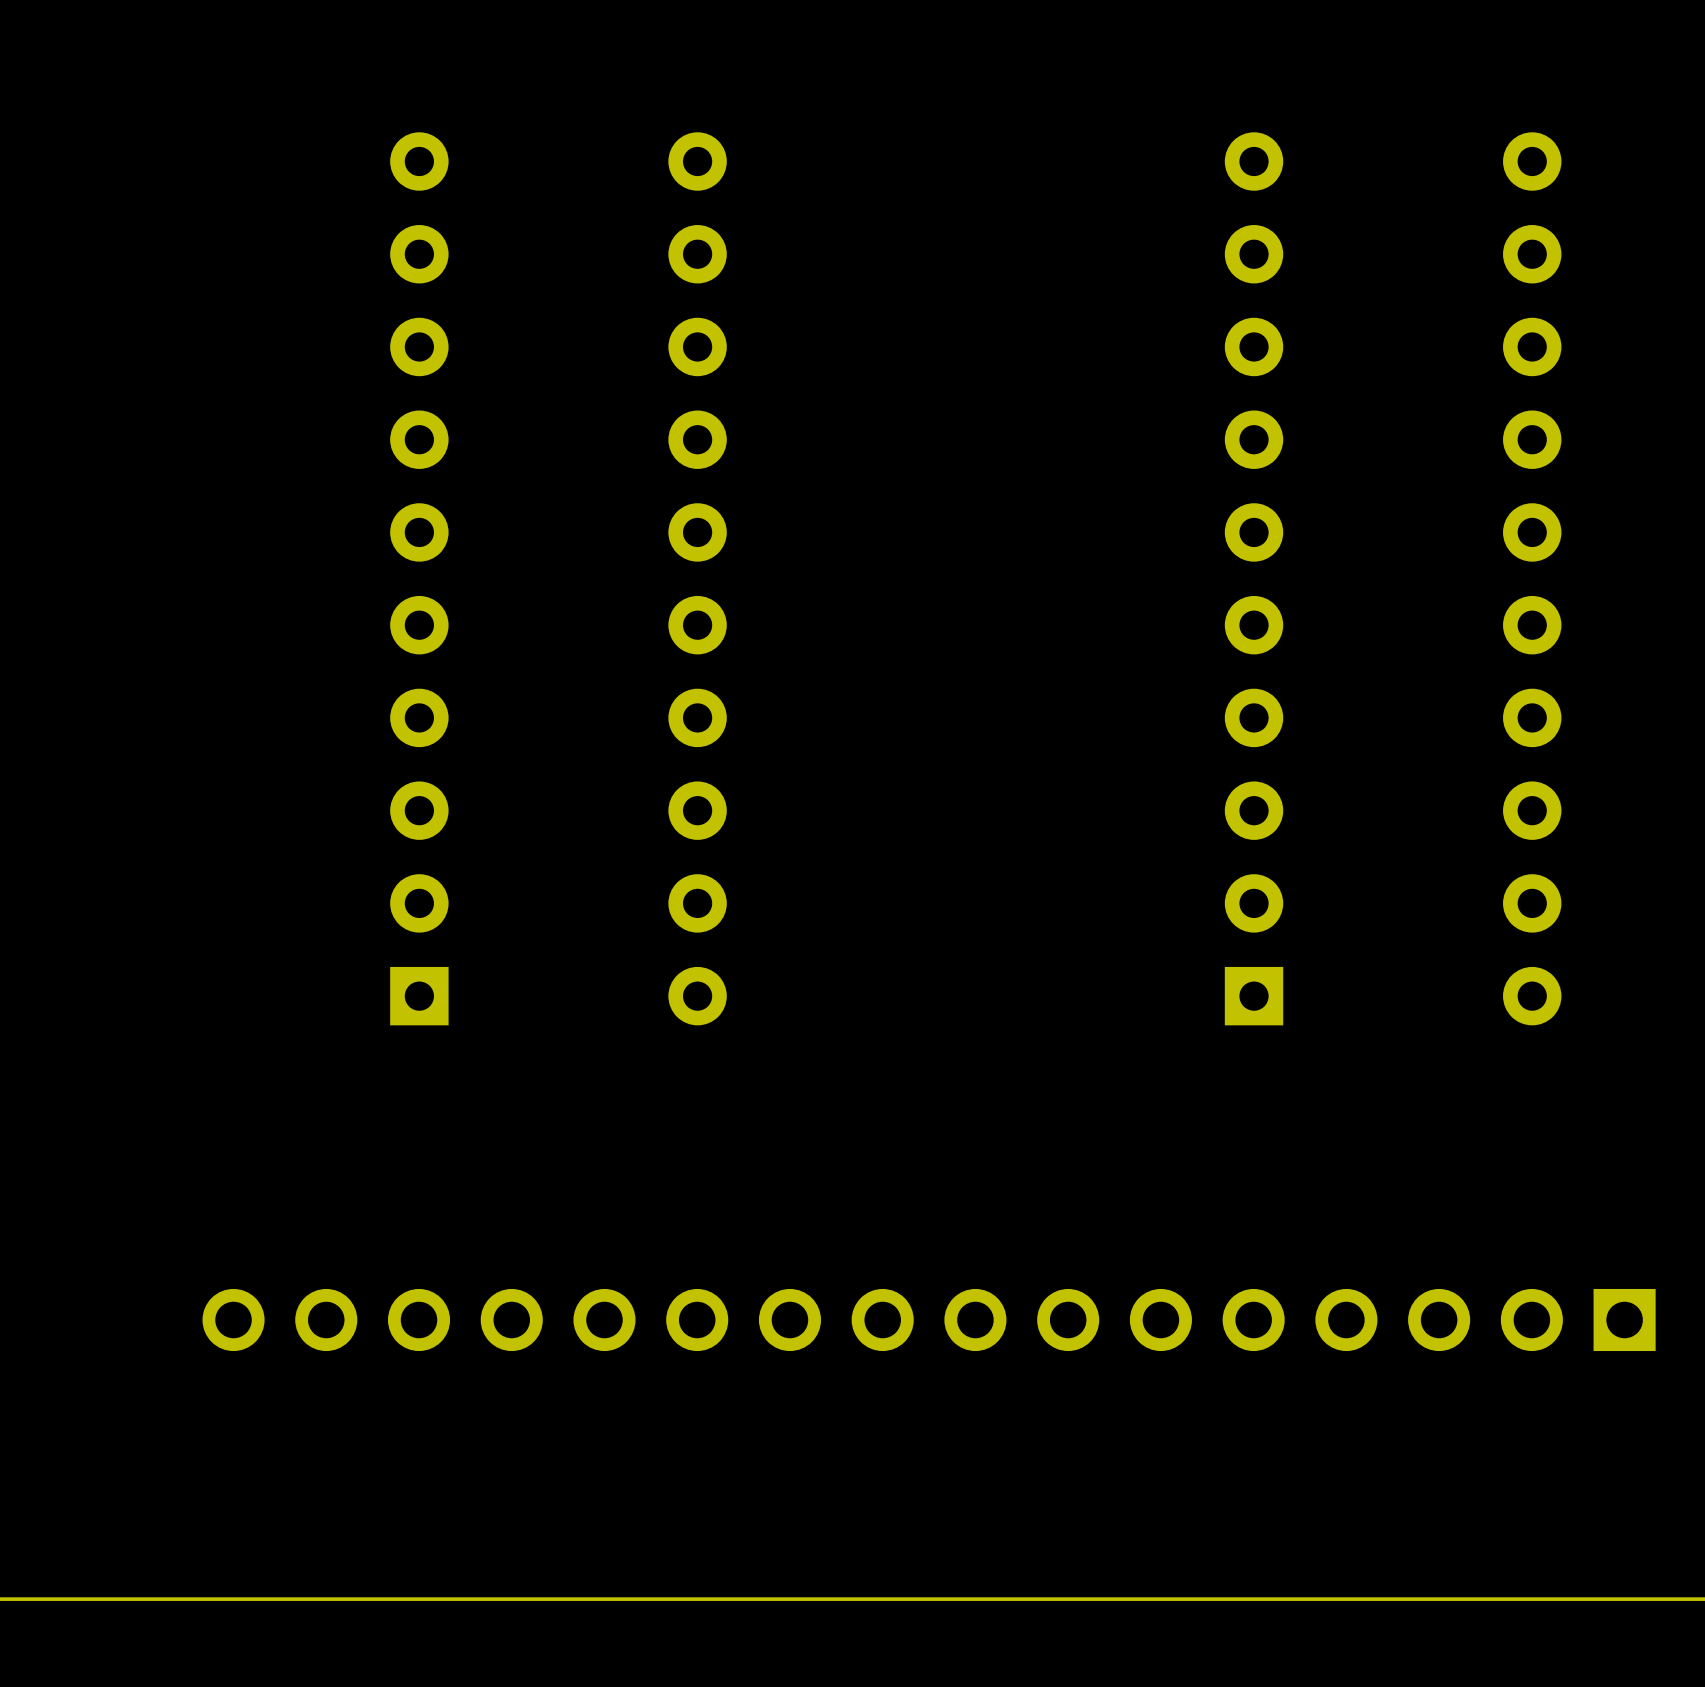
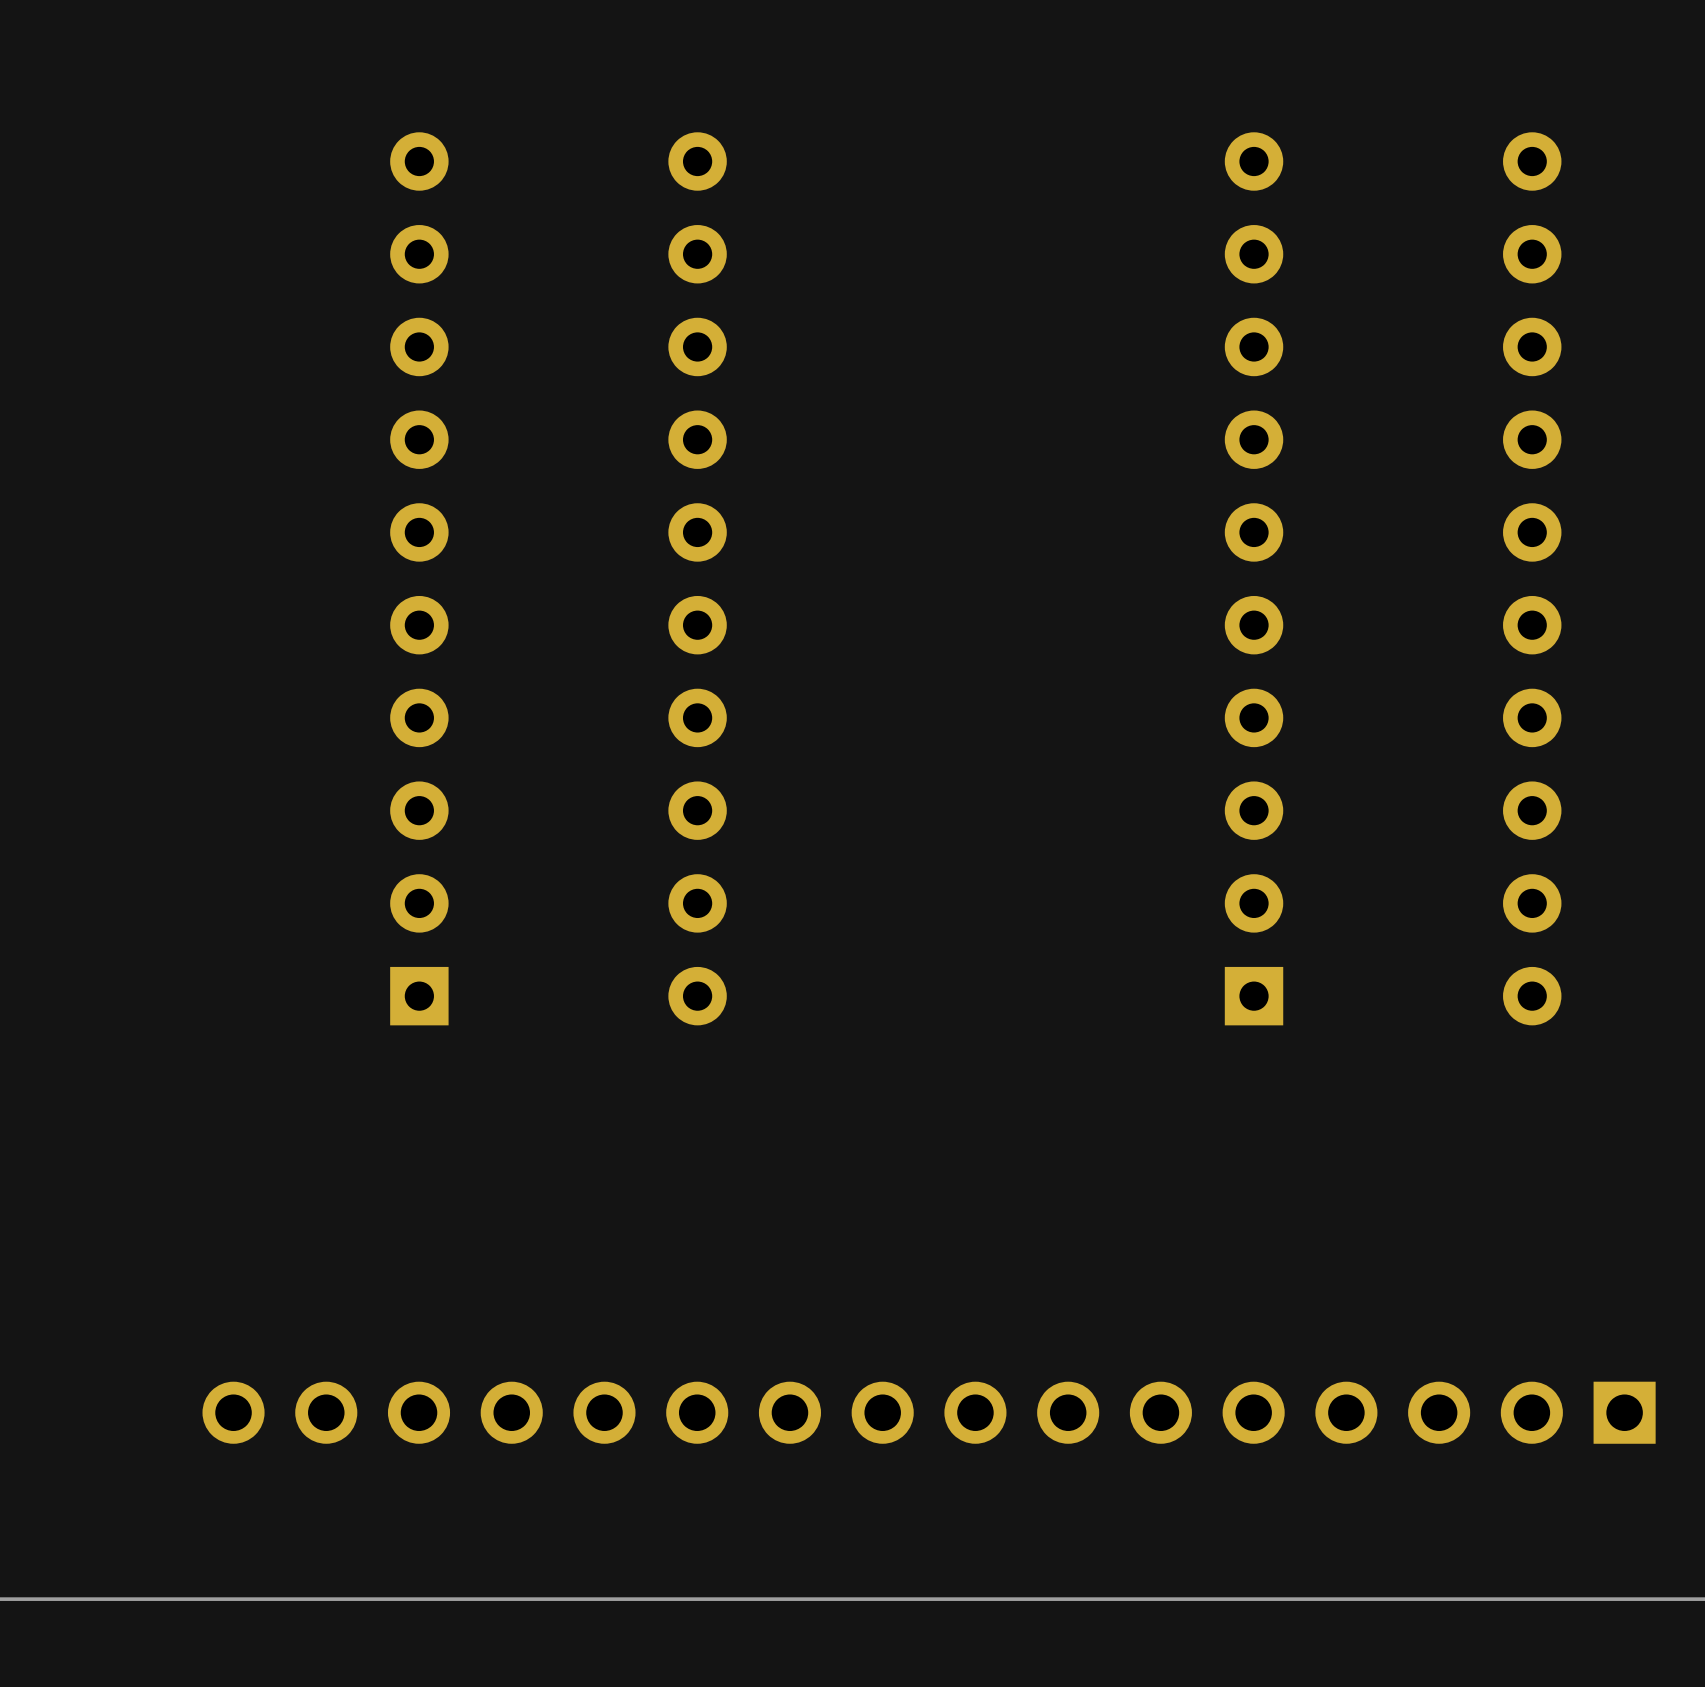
part position: (929, 1320) -> (929, 1412)

